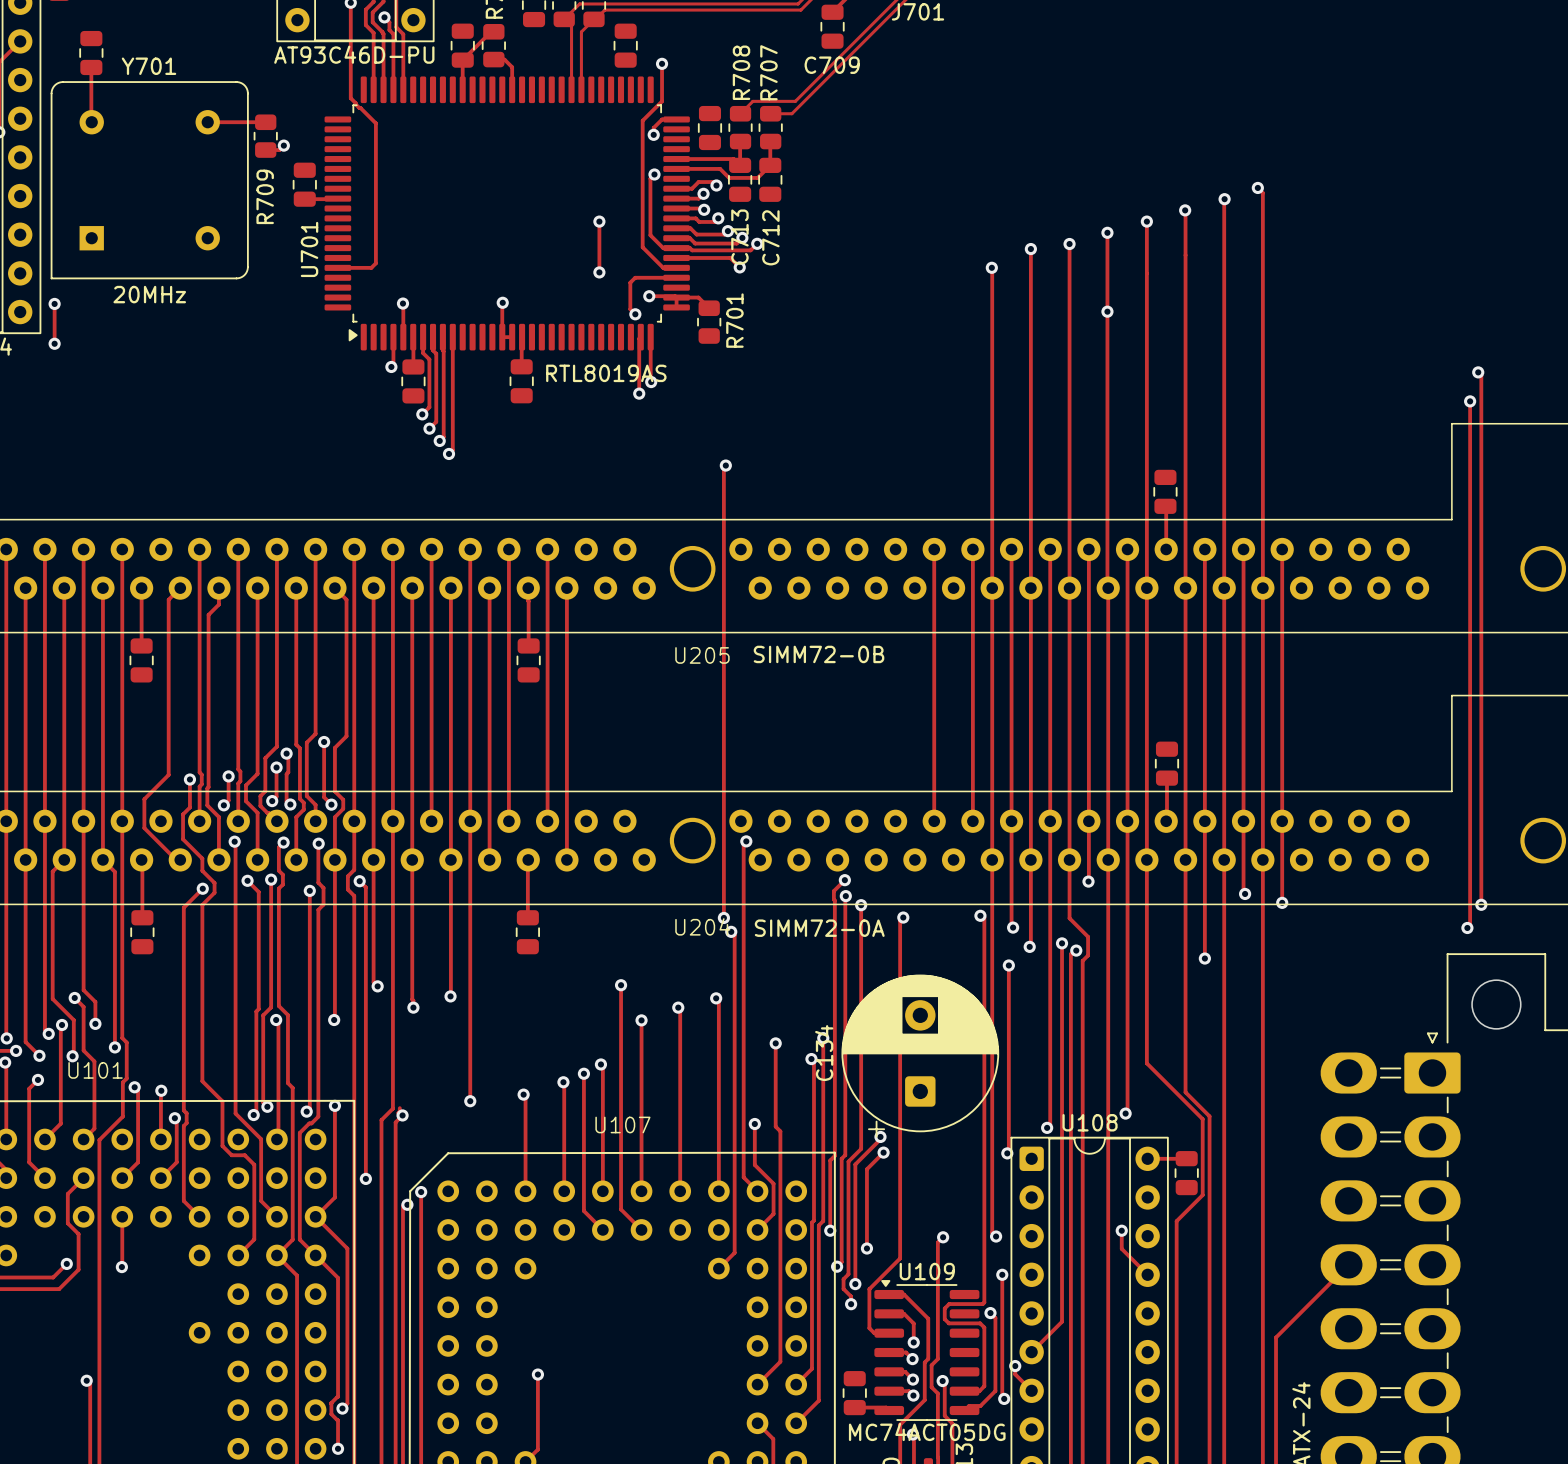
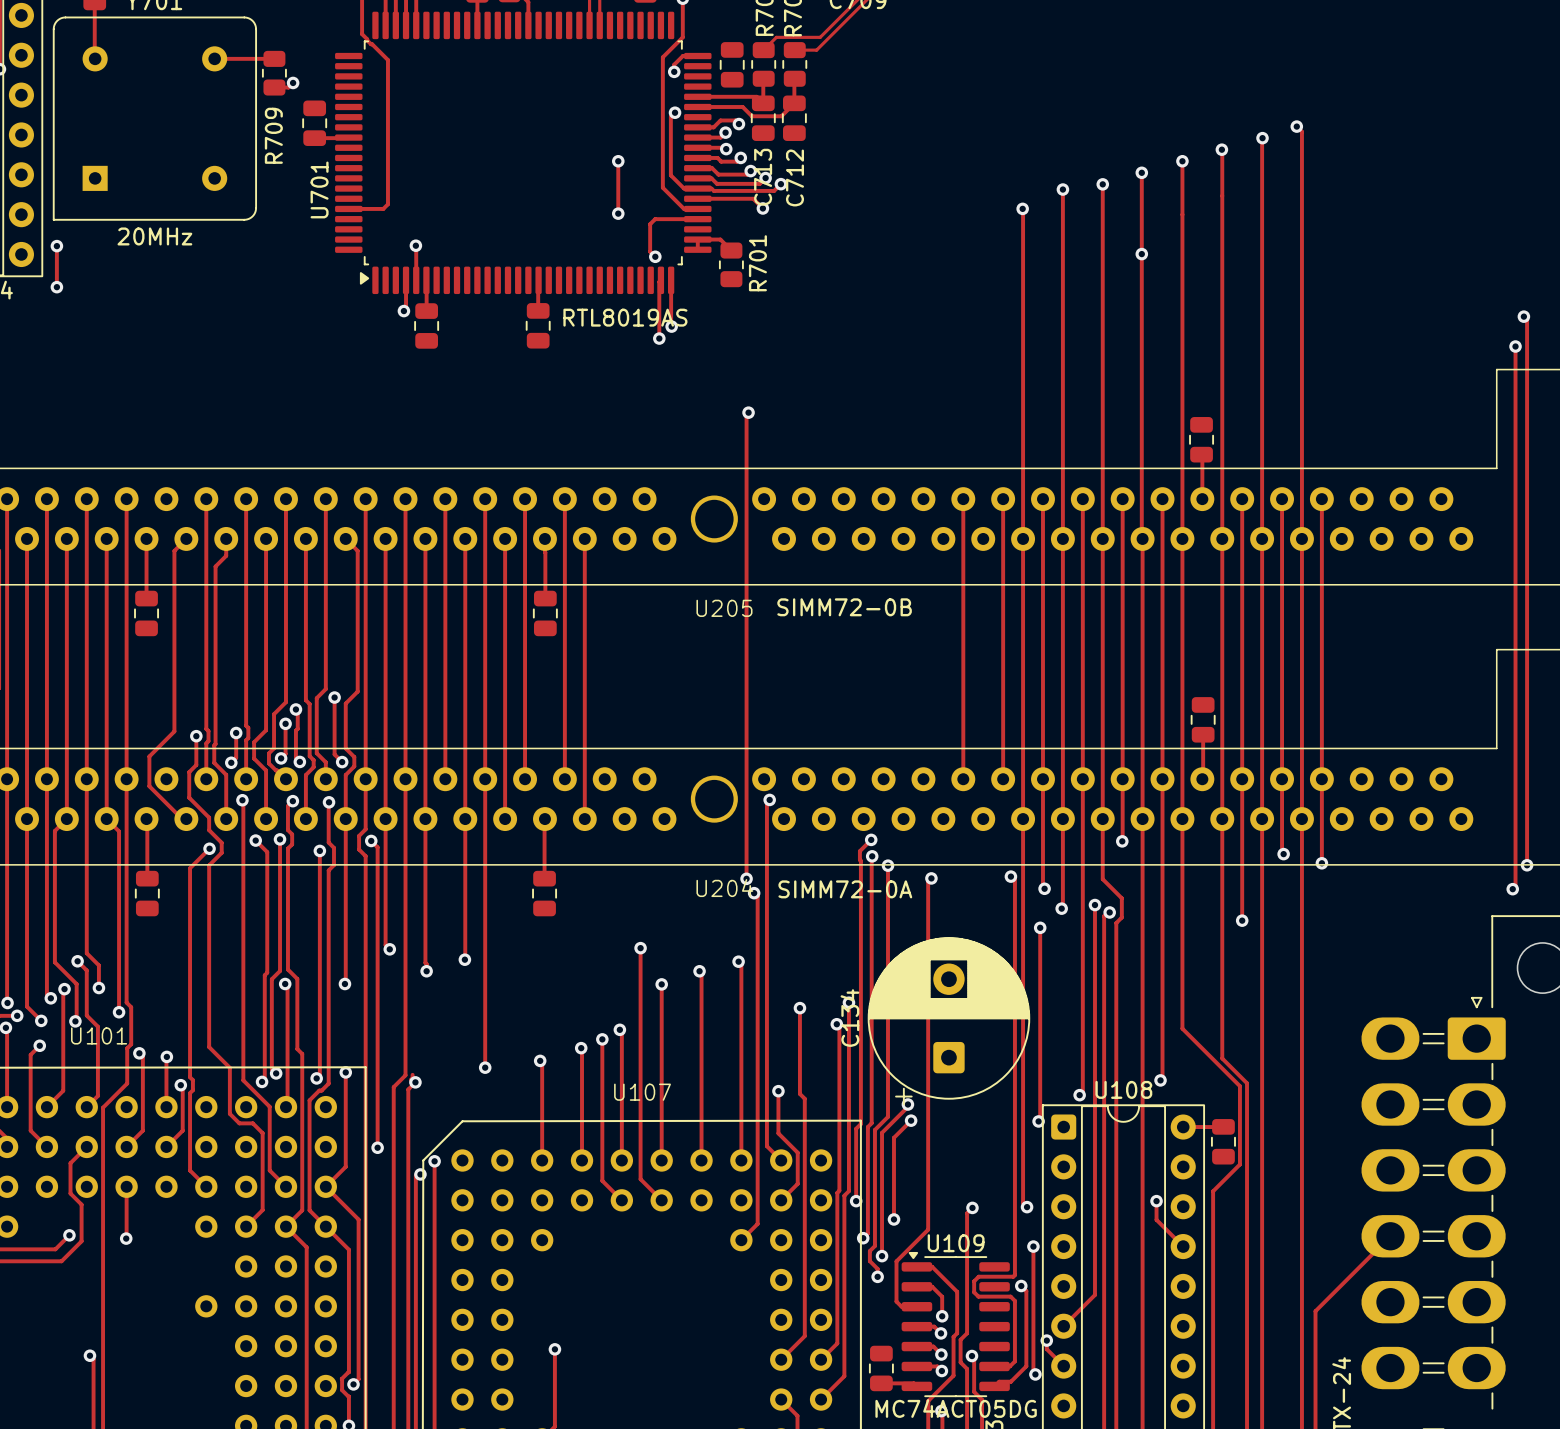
track: (649, 296) (676, 297) -> none
via: (649, 296) -> none
track: (502, 302) (502, 337) (512, 337) -> none
via: (502, 302) -> none
track: (423, 337) (423, 353) (429, 359) (429, 407) (422, 414) -> none
track: (433, 337) (433, 350) (436, 353) (436, 421) (429, 428) -> none
track: (442, 337) (443, 436) (439, 440) -> none
track: (452, 337) (452, 450) (448, 453) -> none
via: (422, 414) -> none
via: (429, 428) -> none
via: (439, 440) -> none
via: (448, 453) -> none

